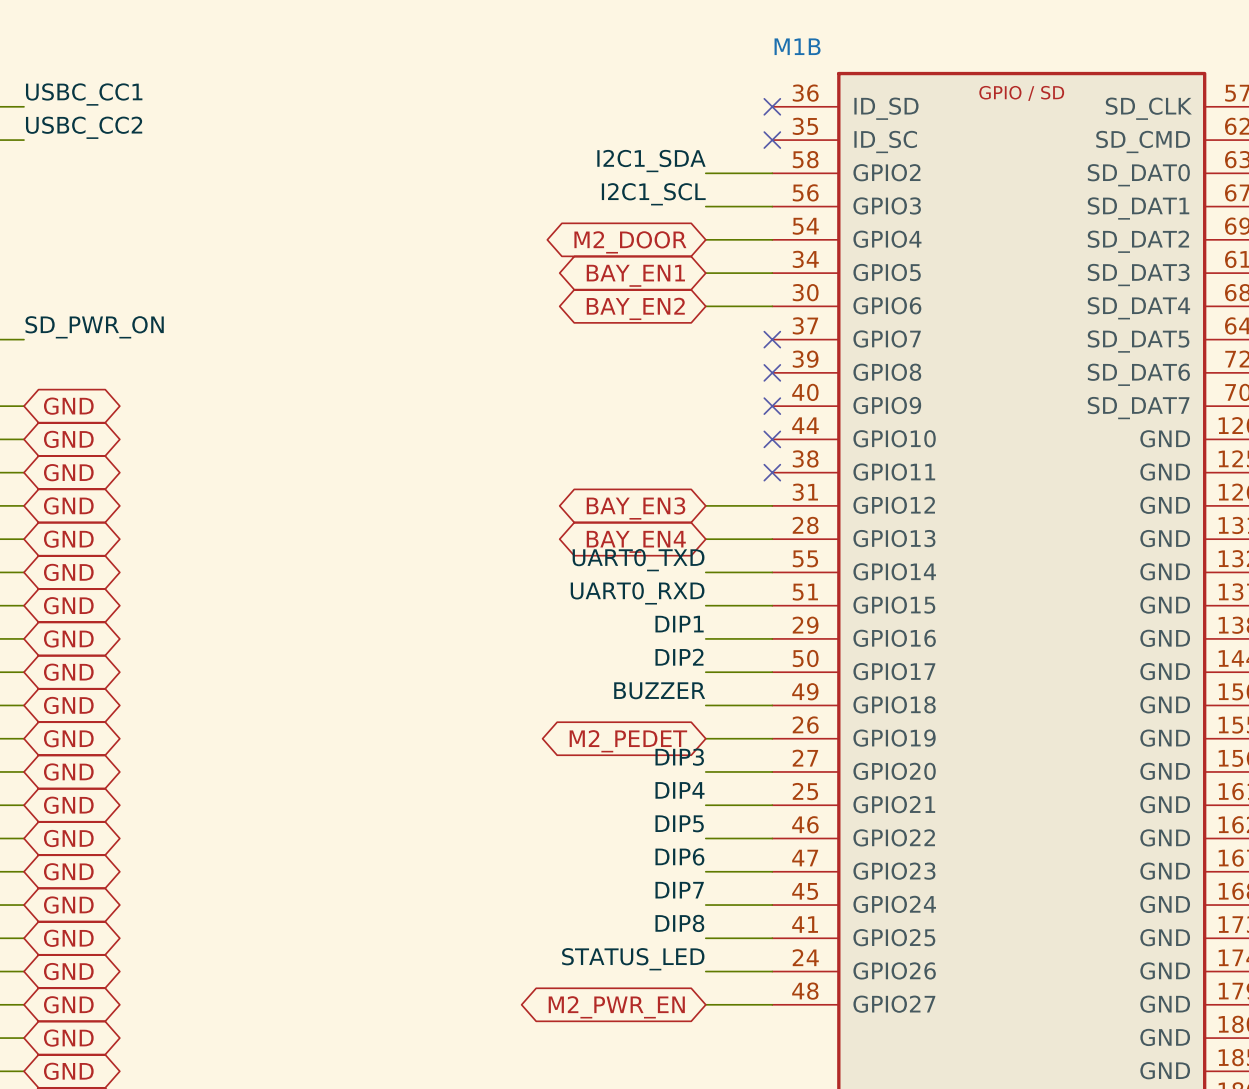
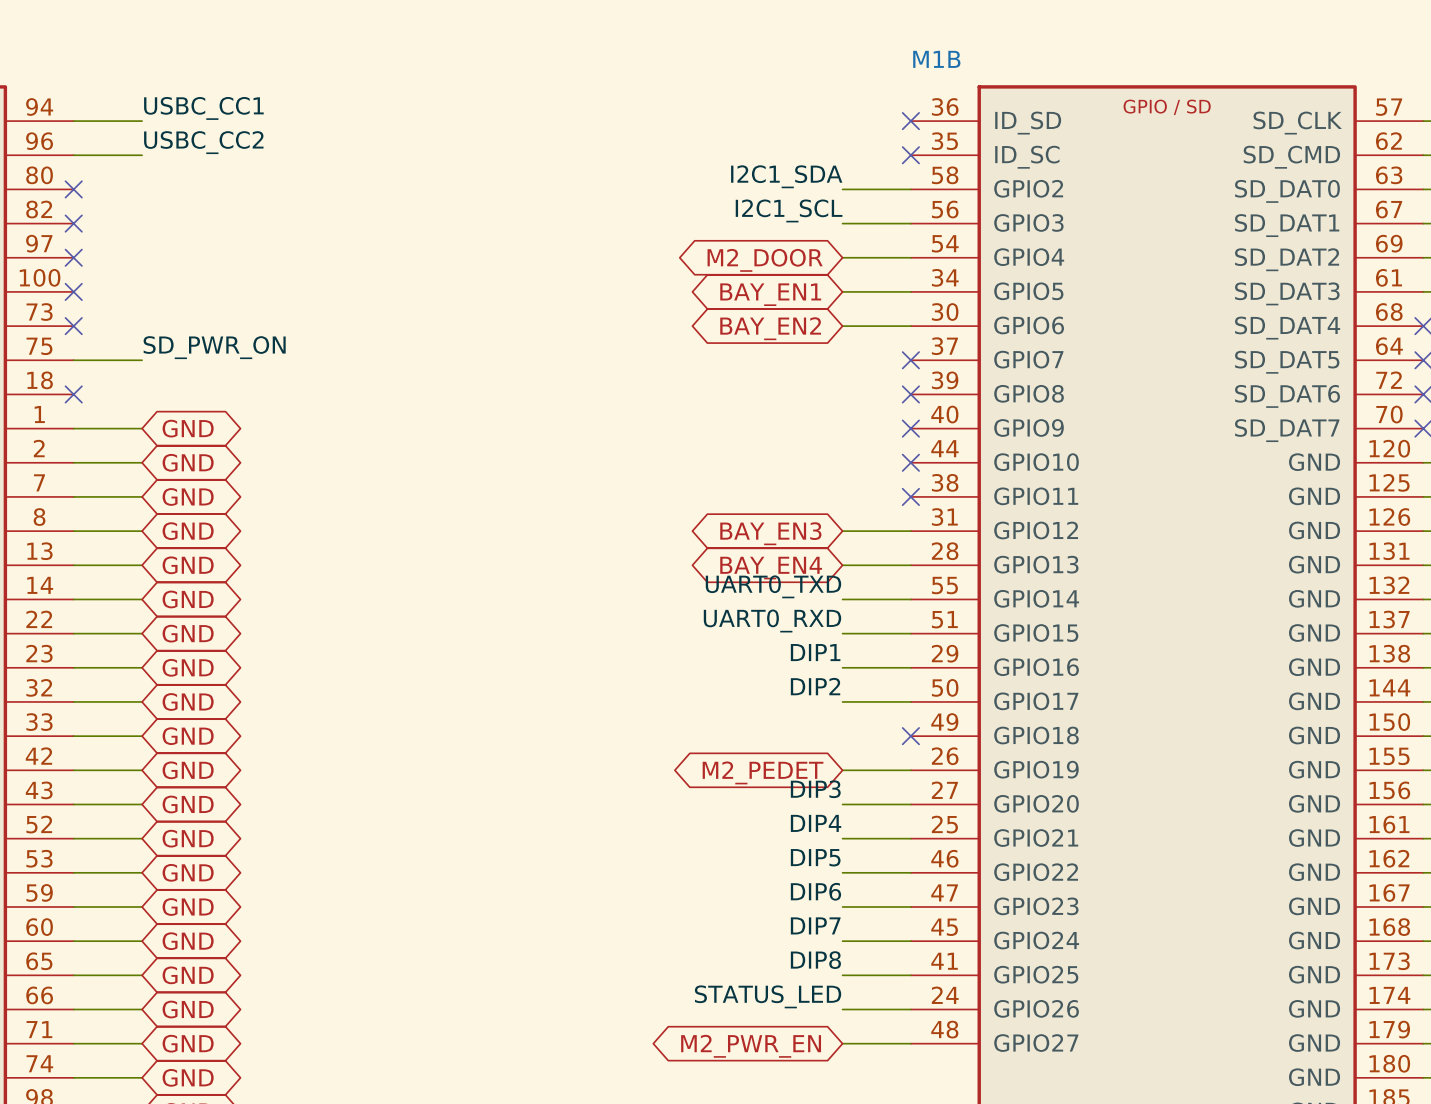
label: BUZZER (659, 690) -> none
wire: (705, 705) (772, 705) -> none
no-connect mark: none -> (910, 736)

